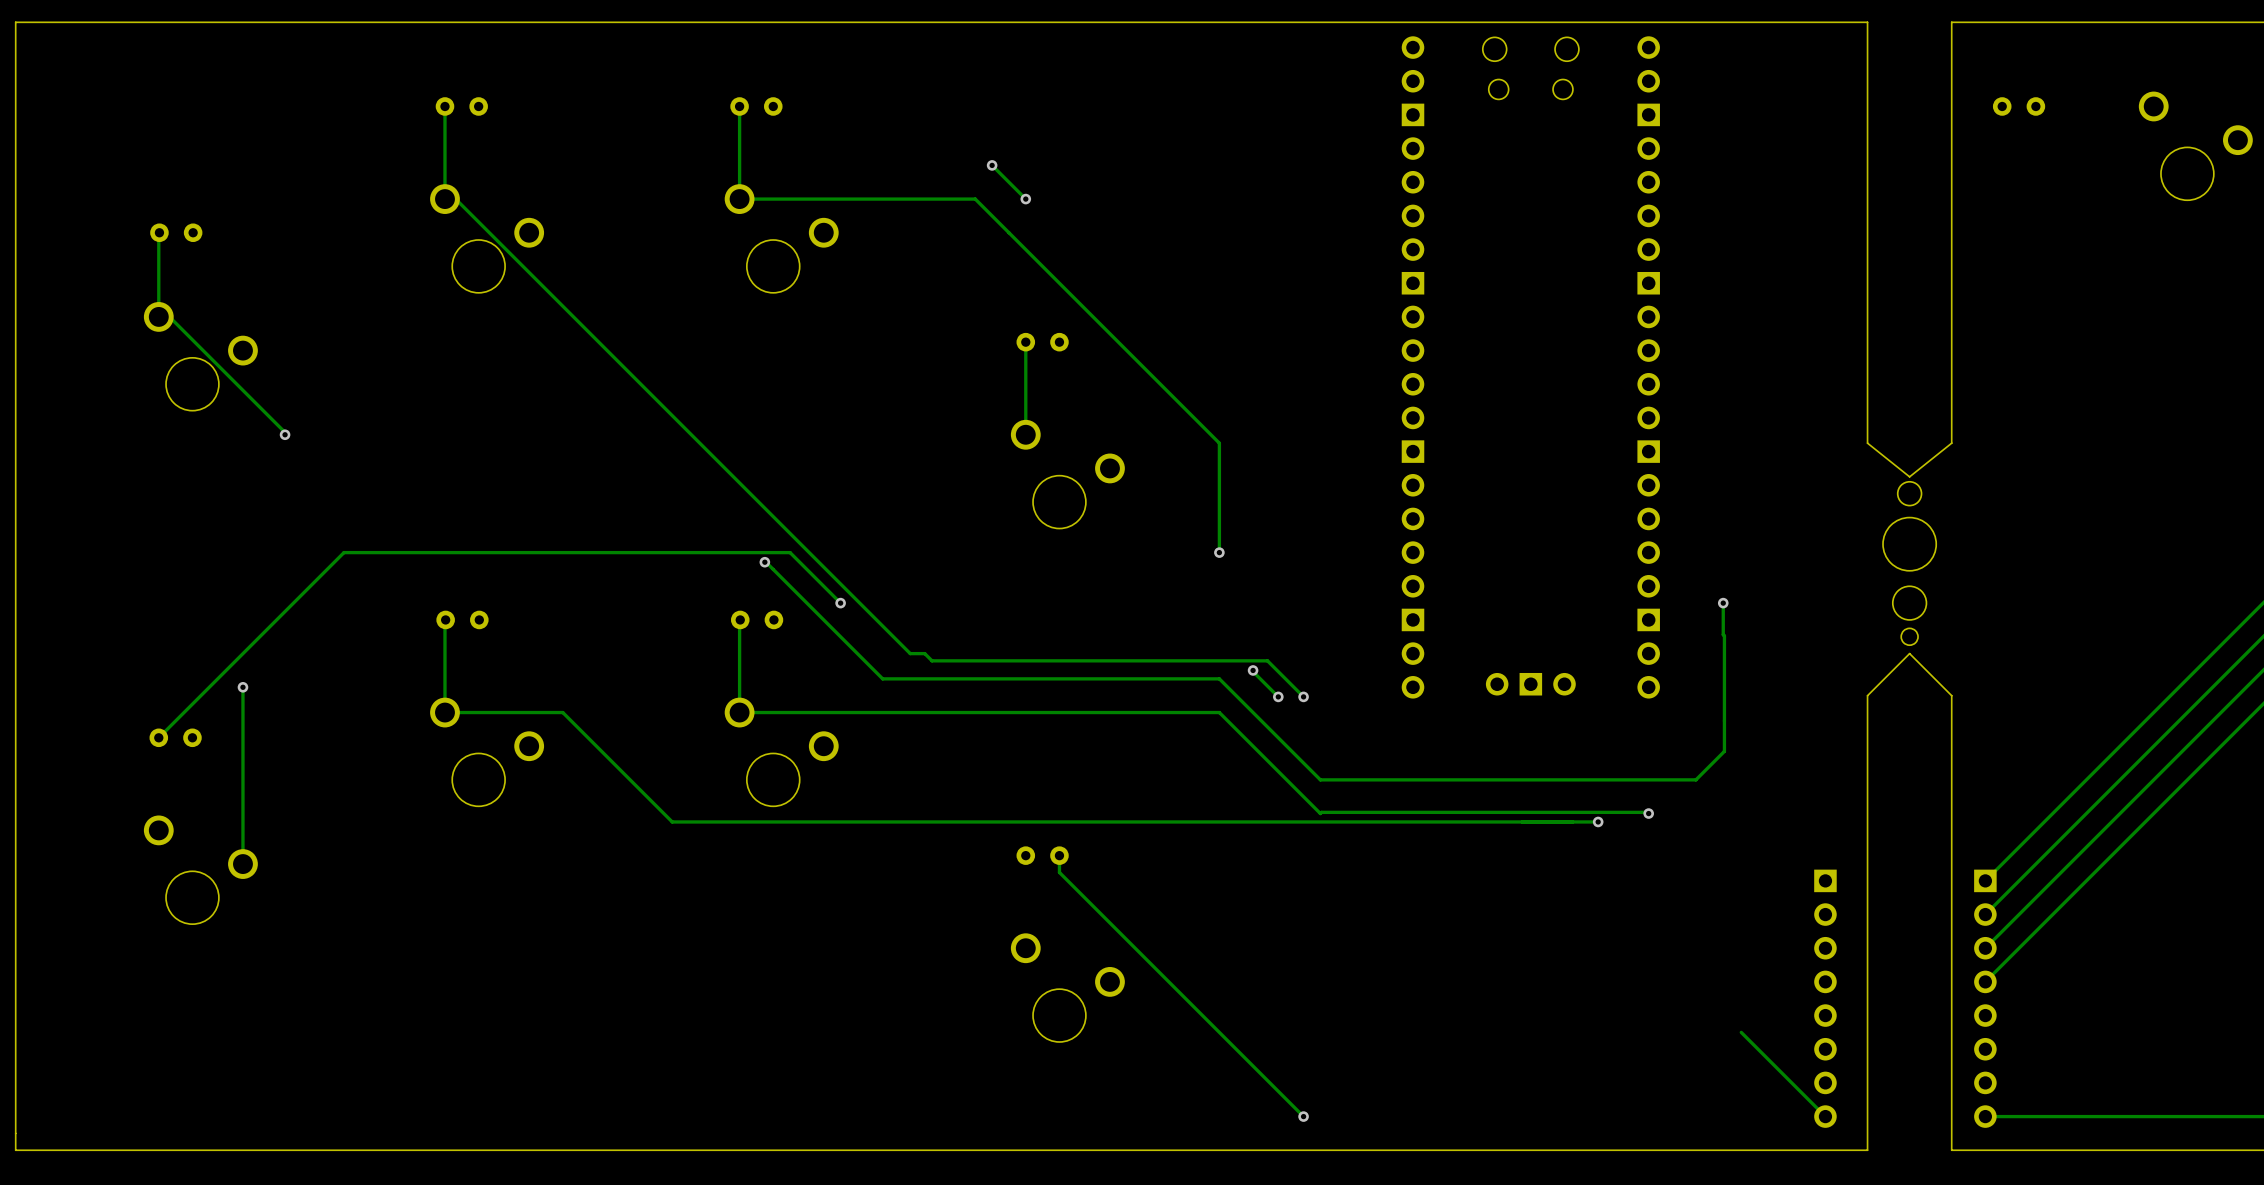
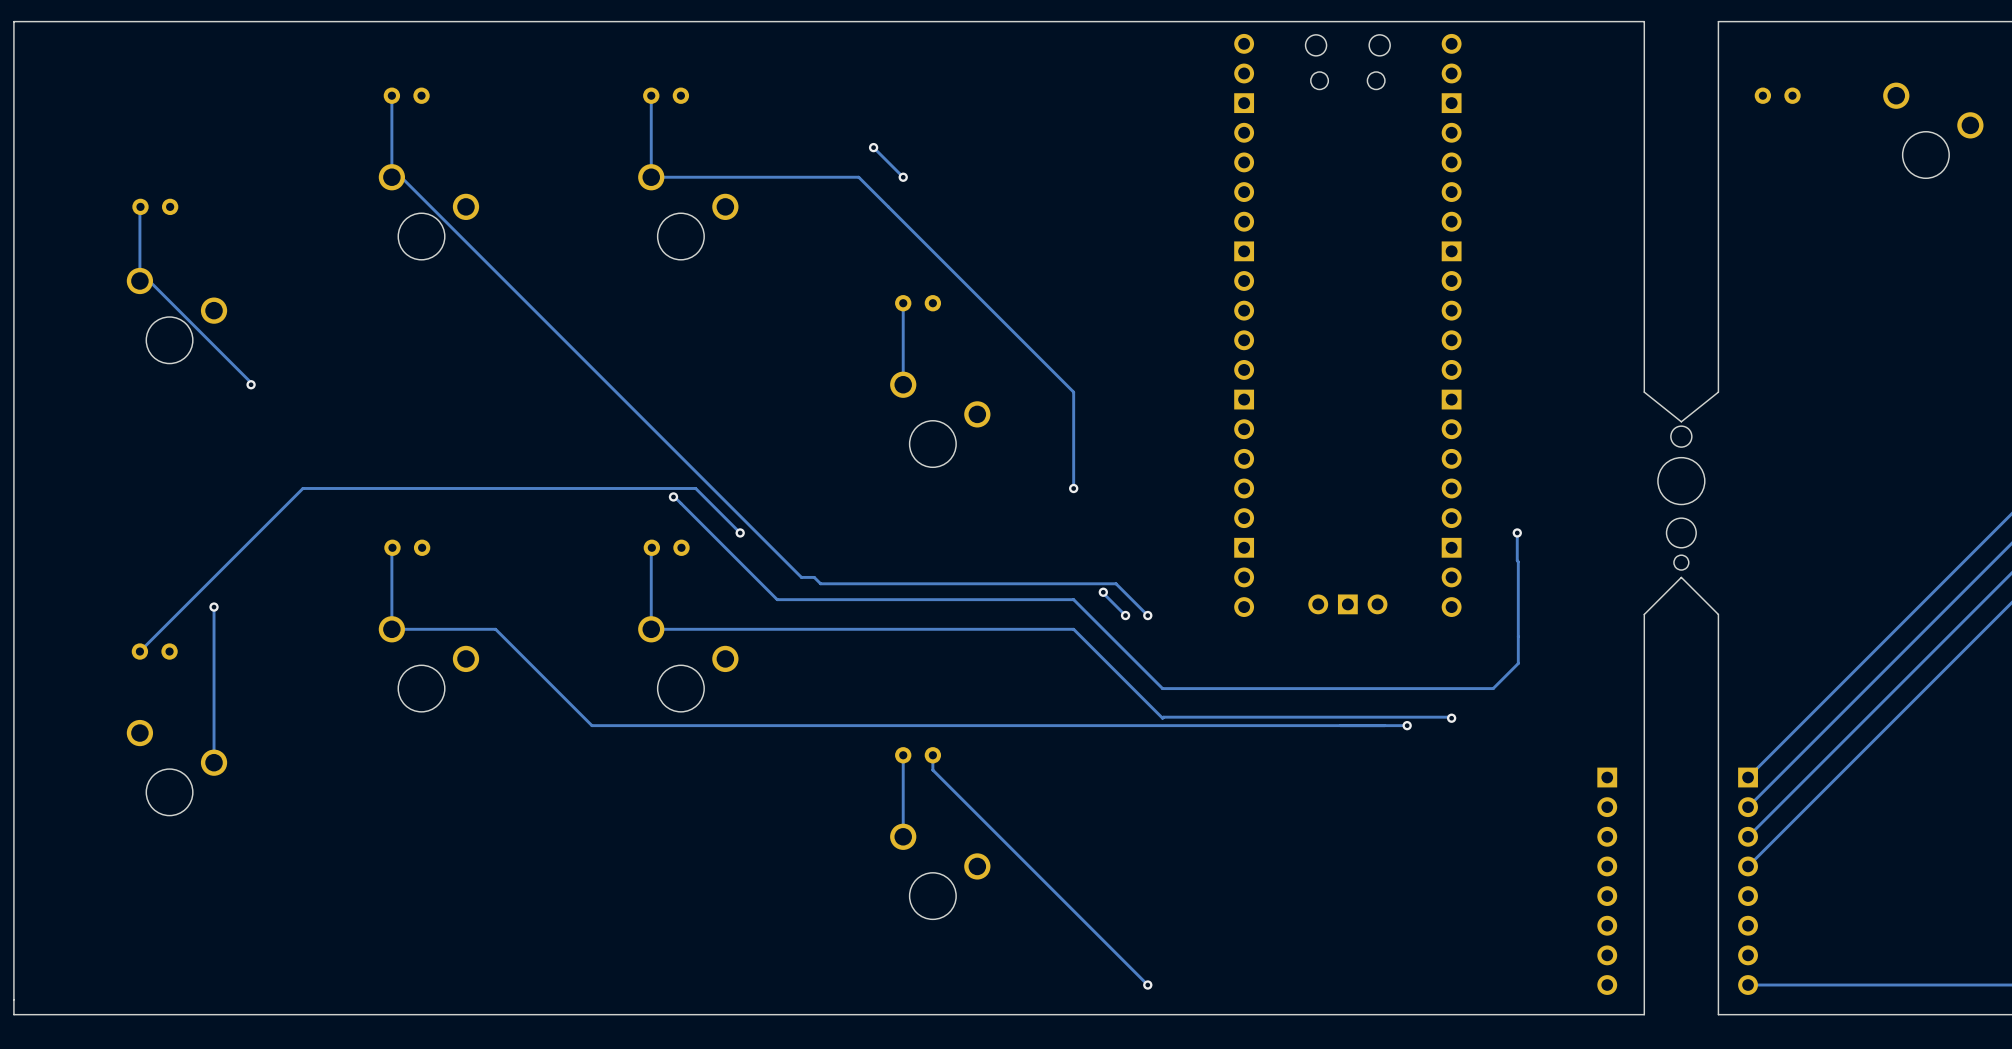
track: none -> (903, 755) (903, 836)
track: (1741, 1032) (1825, 1116) -> none

